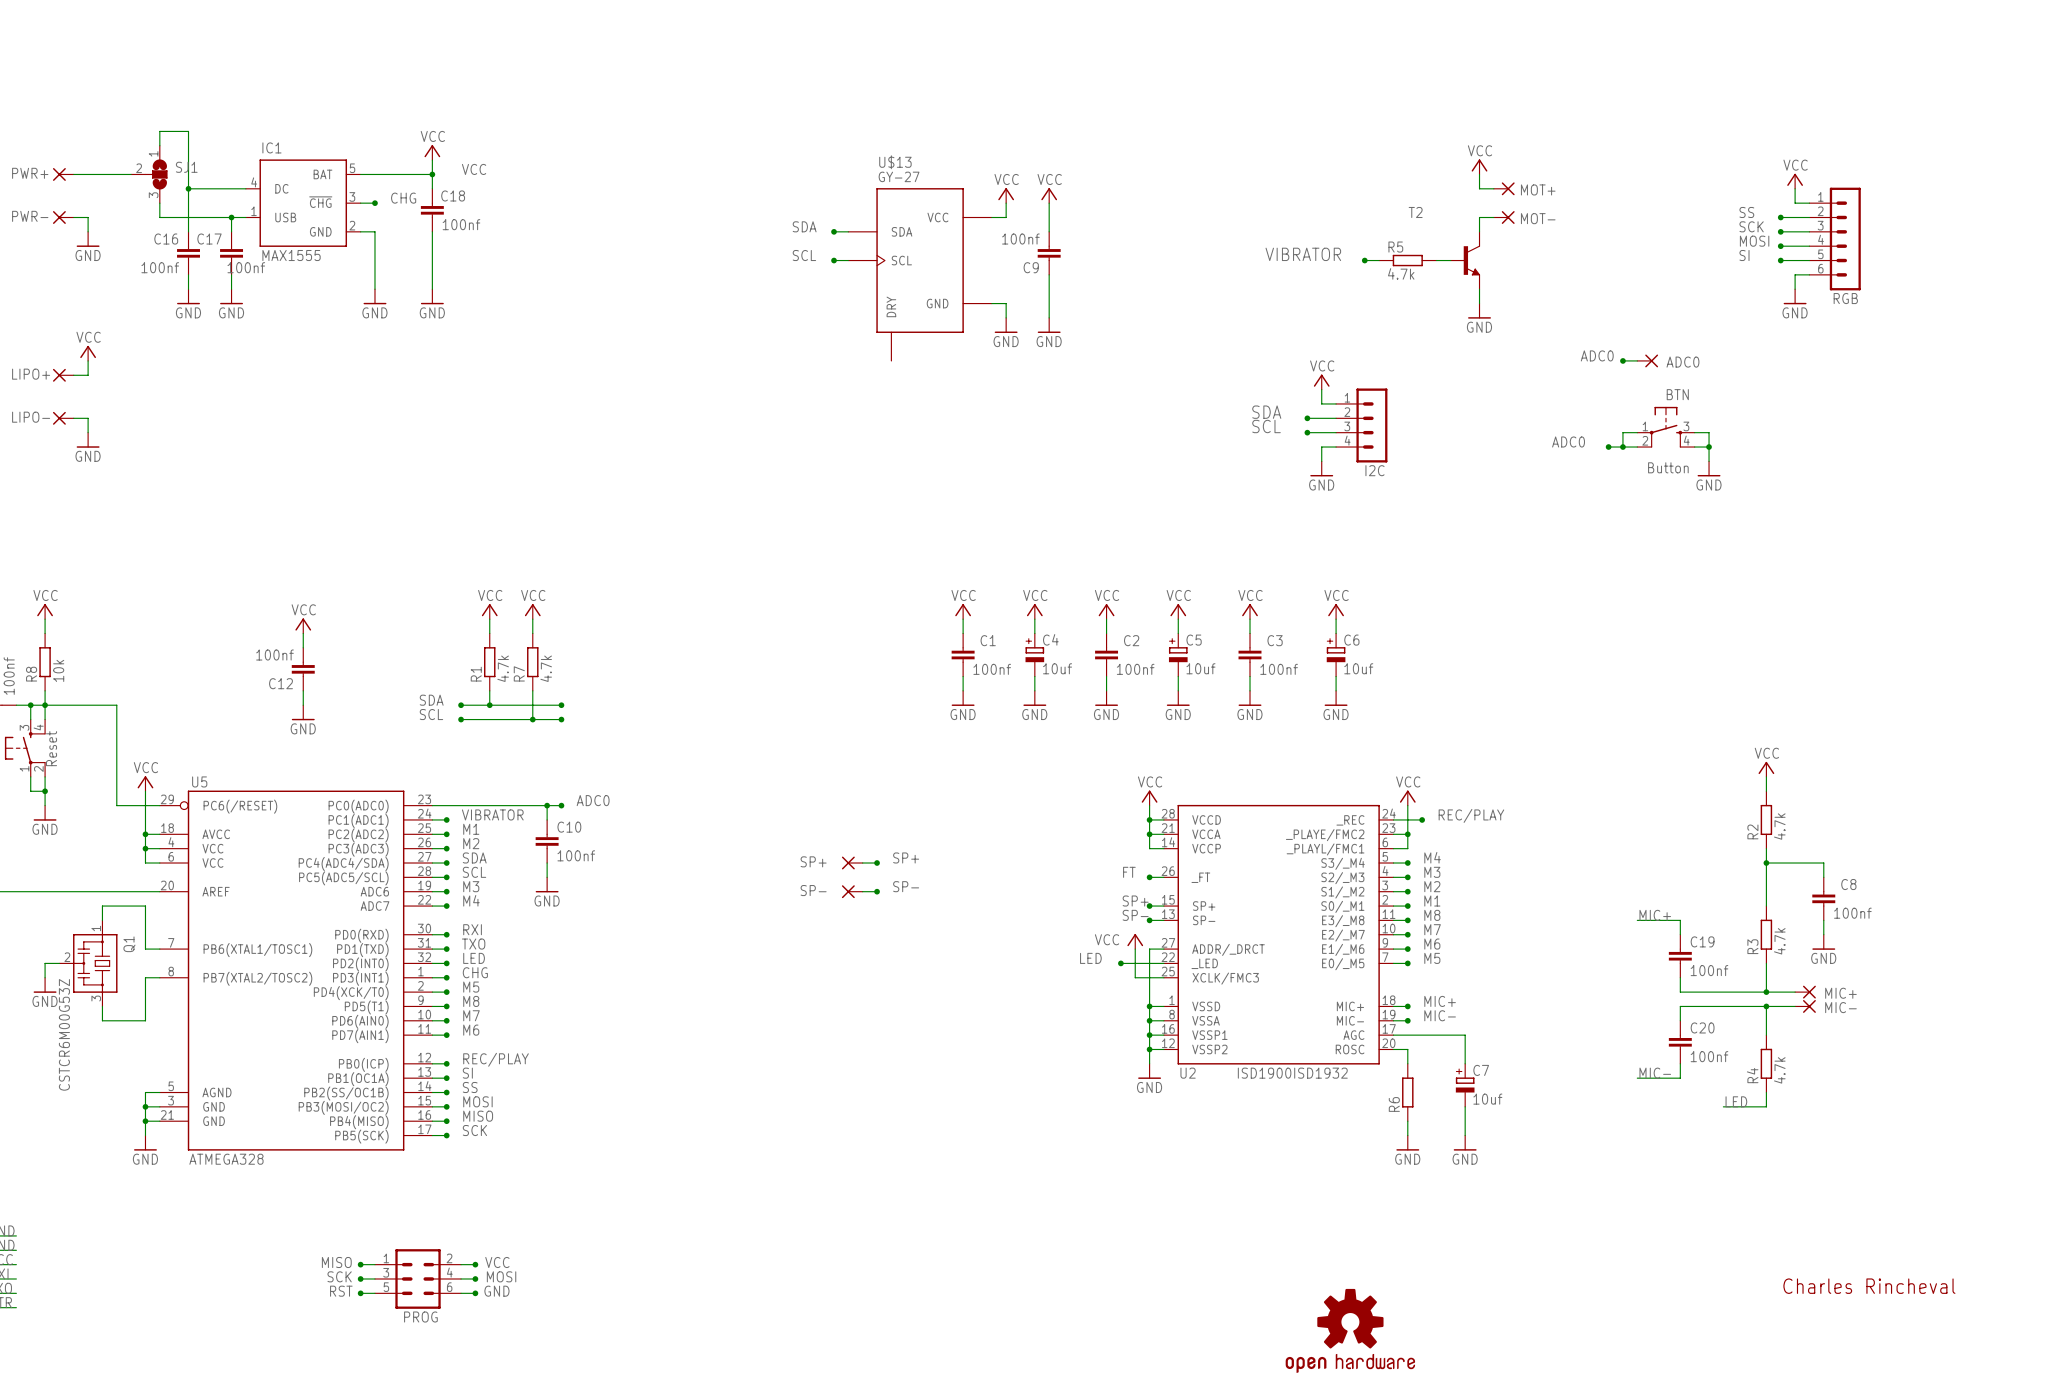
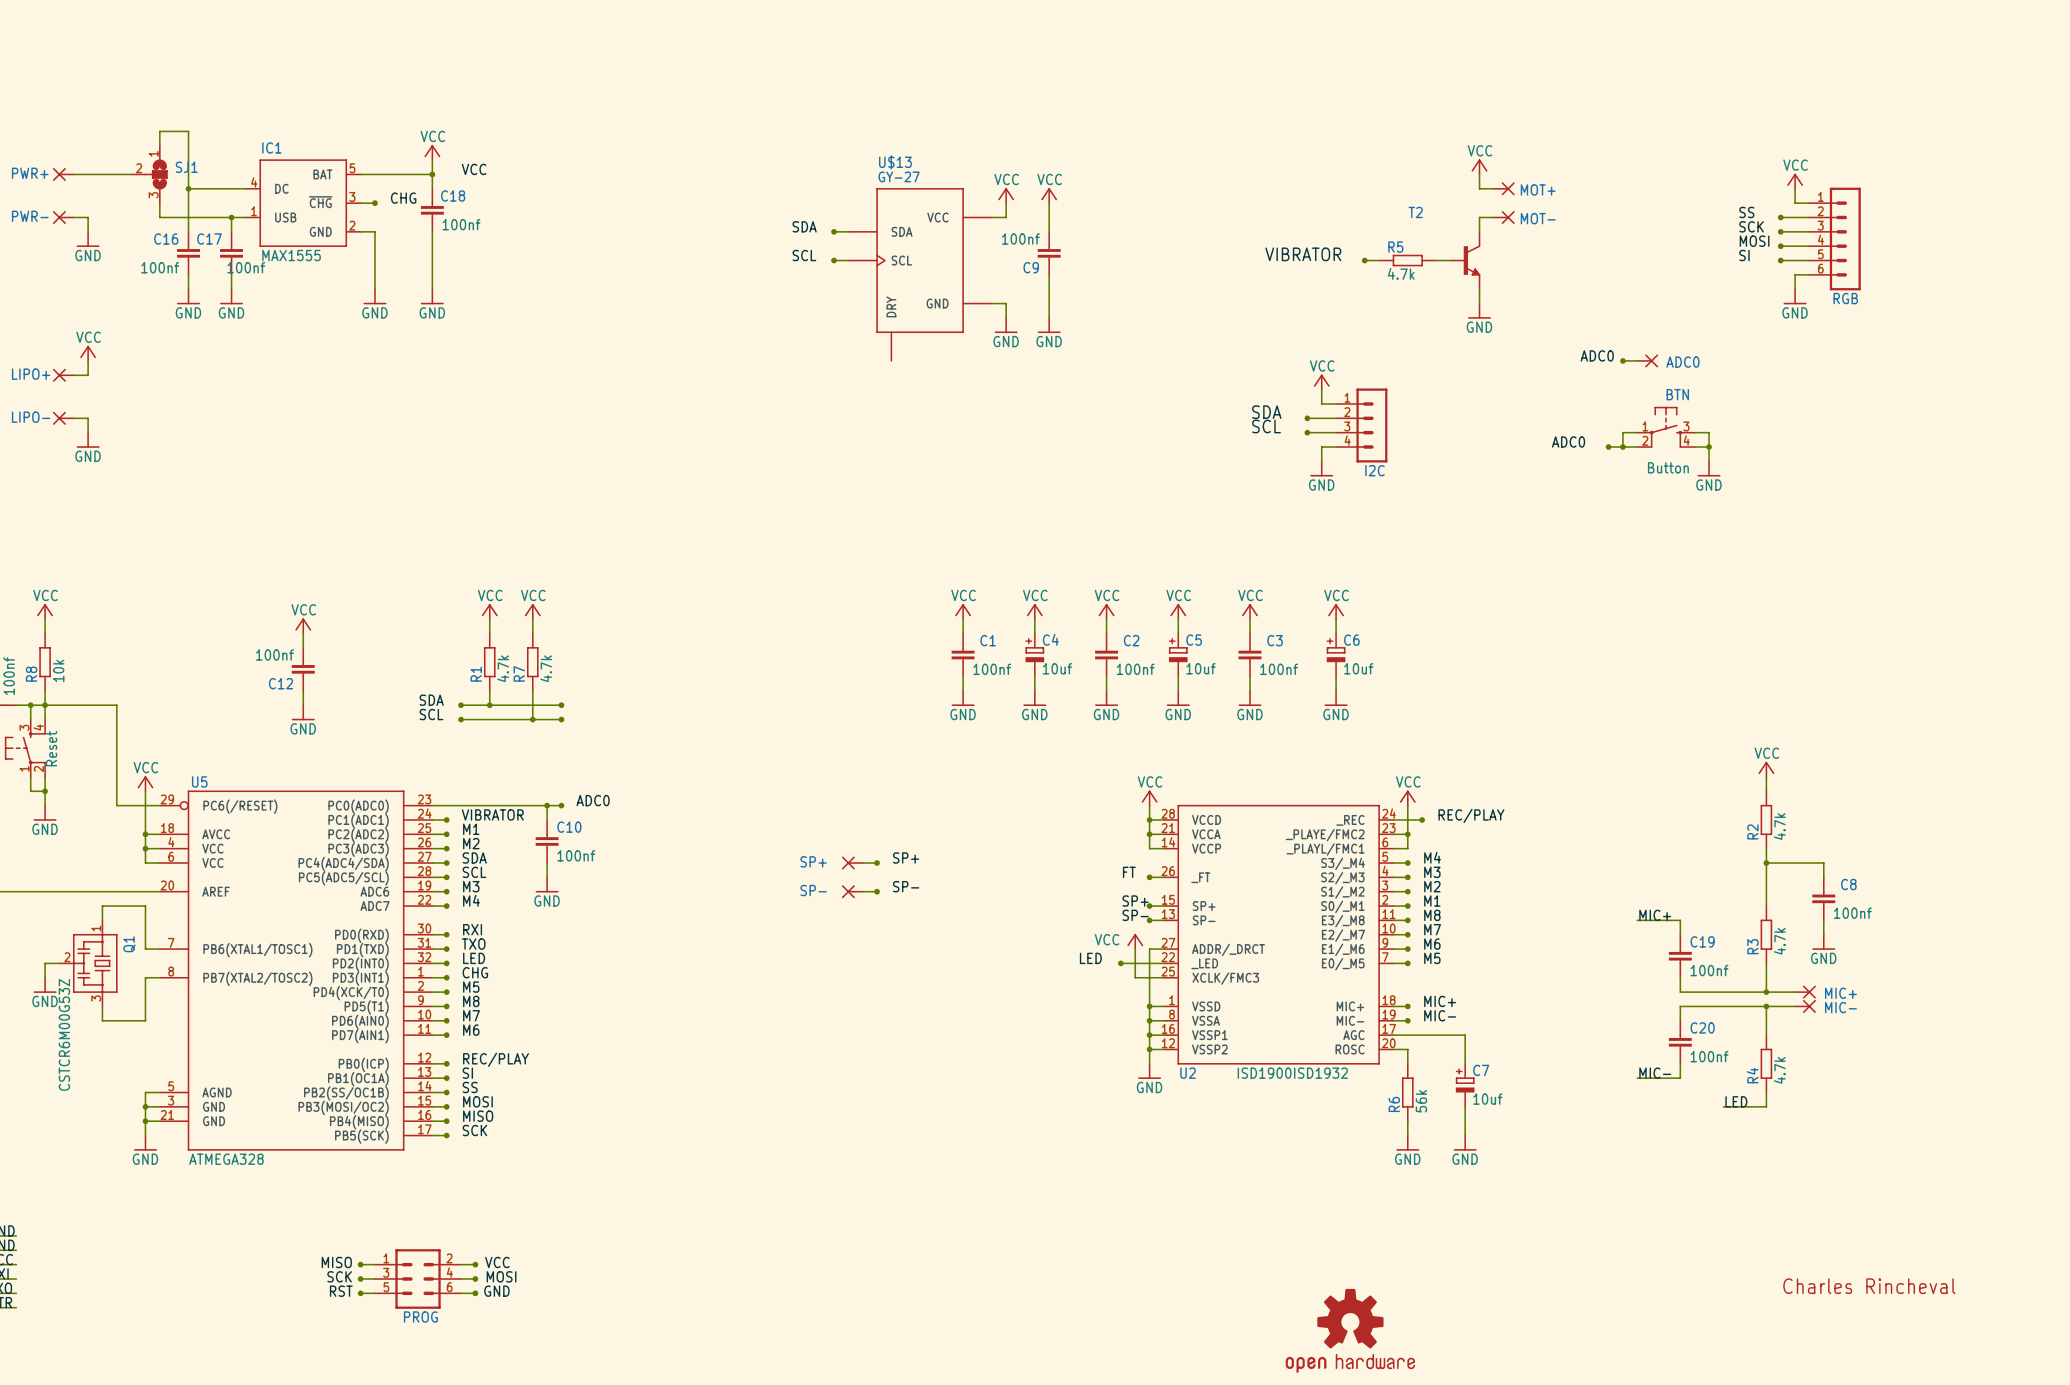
R6 value: none -> 56k (1421, 1101)

